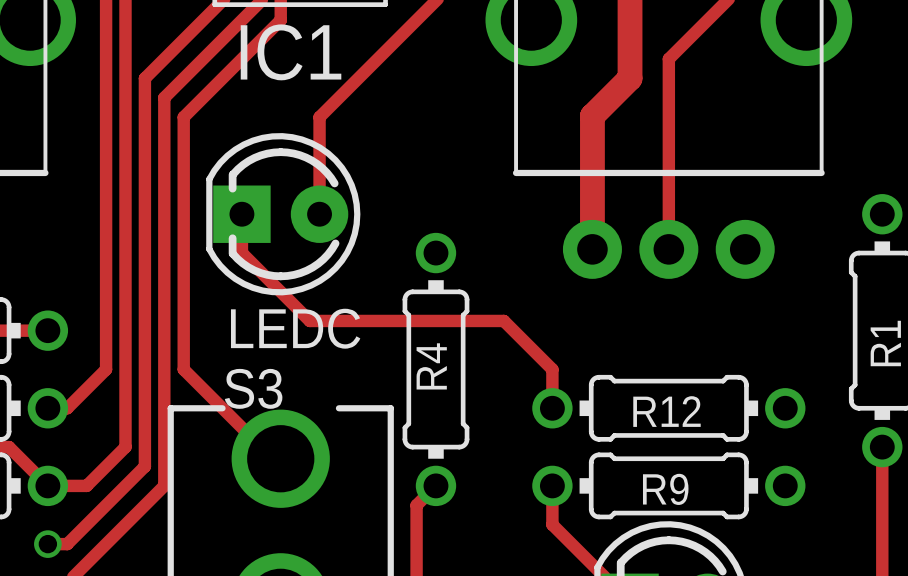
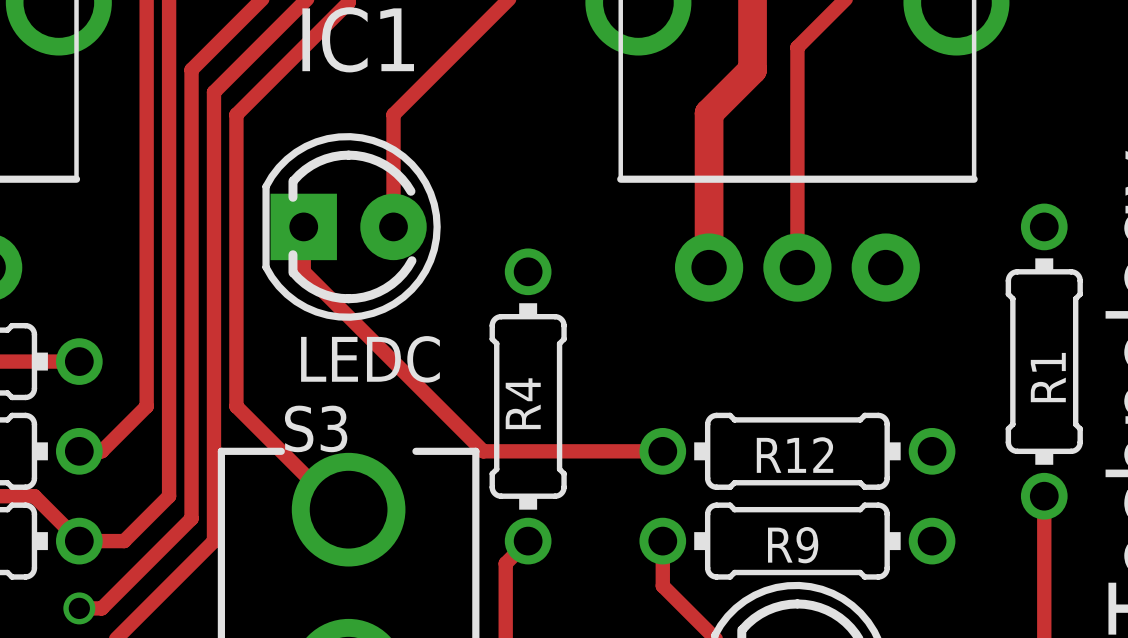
track: (309, 320) (503, 320) (552, 369) (552, 408) -> (382, 350) (483, 451) (662, 451)

